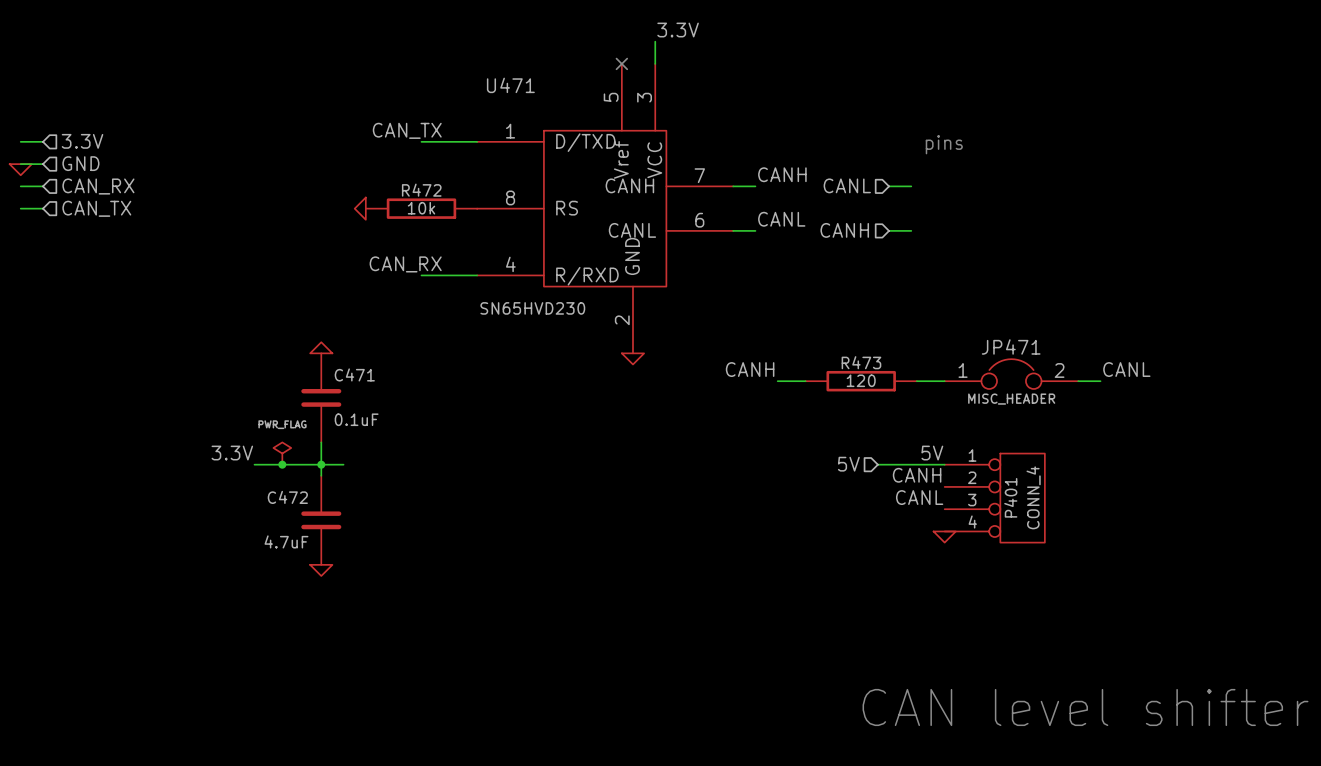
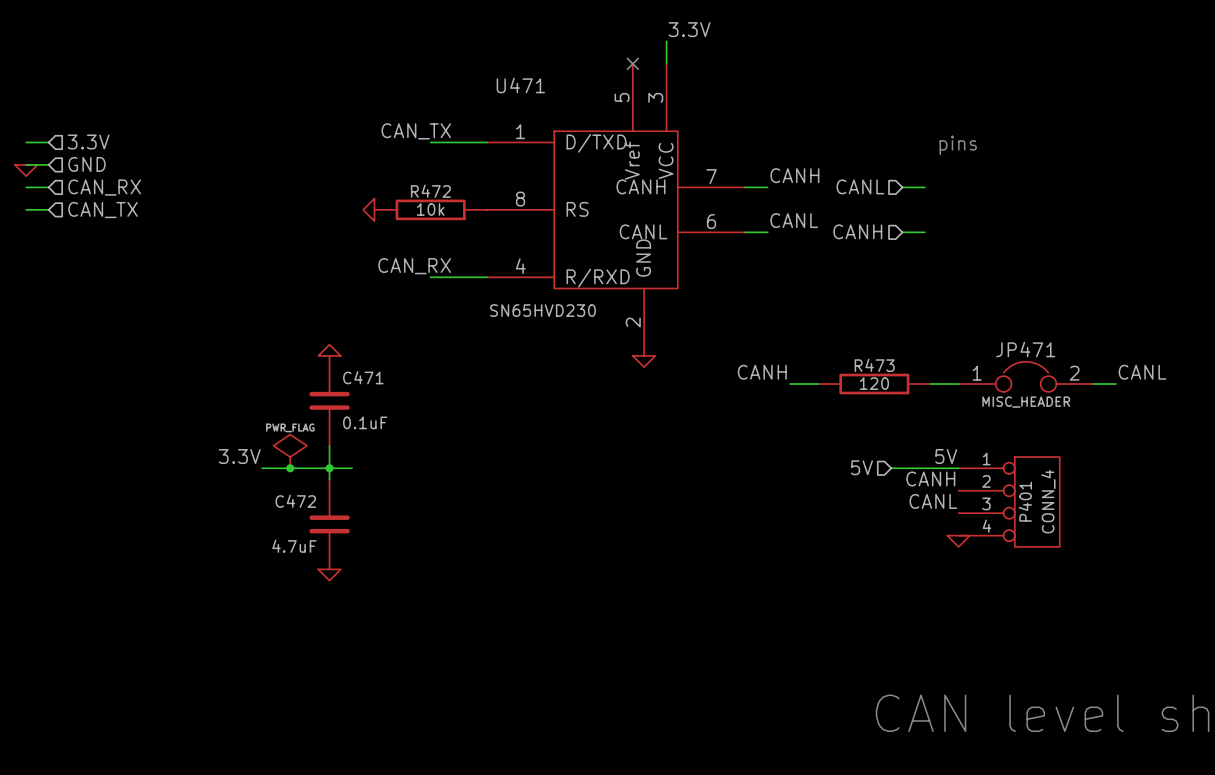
power symbol shape: [273, 442, 292, 465] -> [273, 434, 308, 469]

